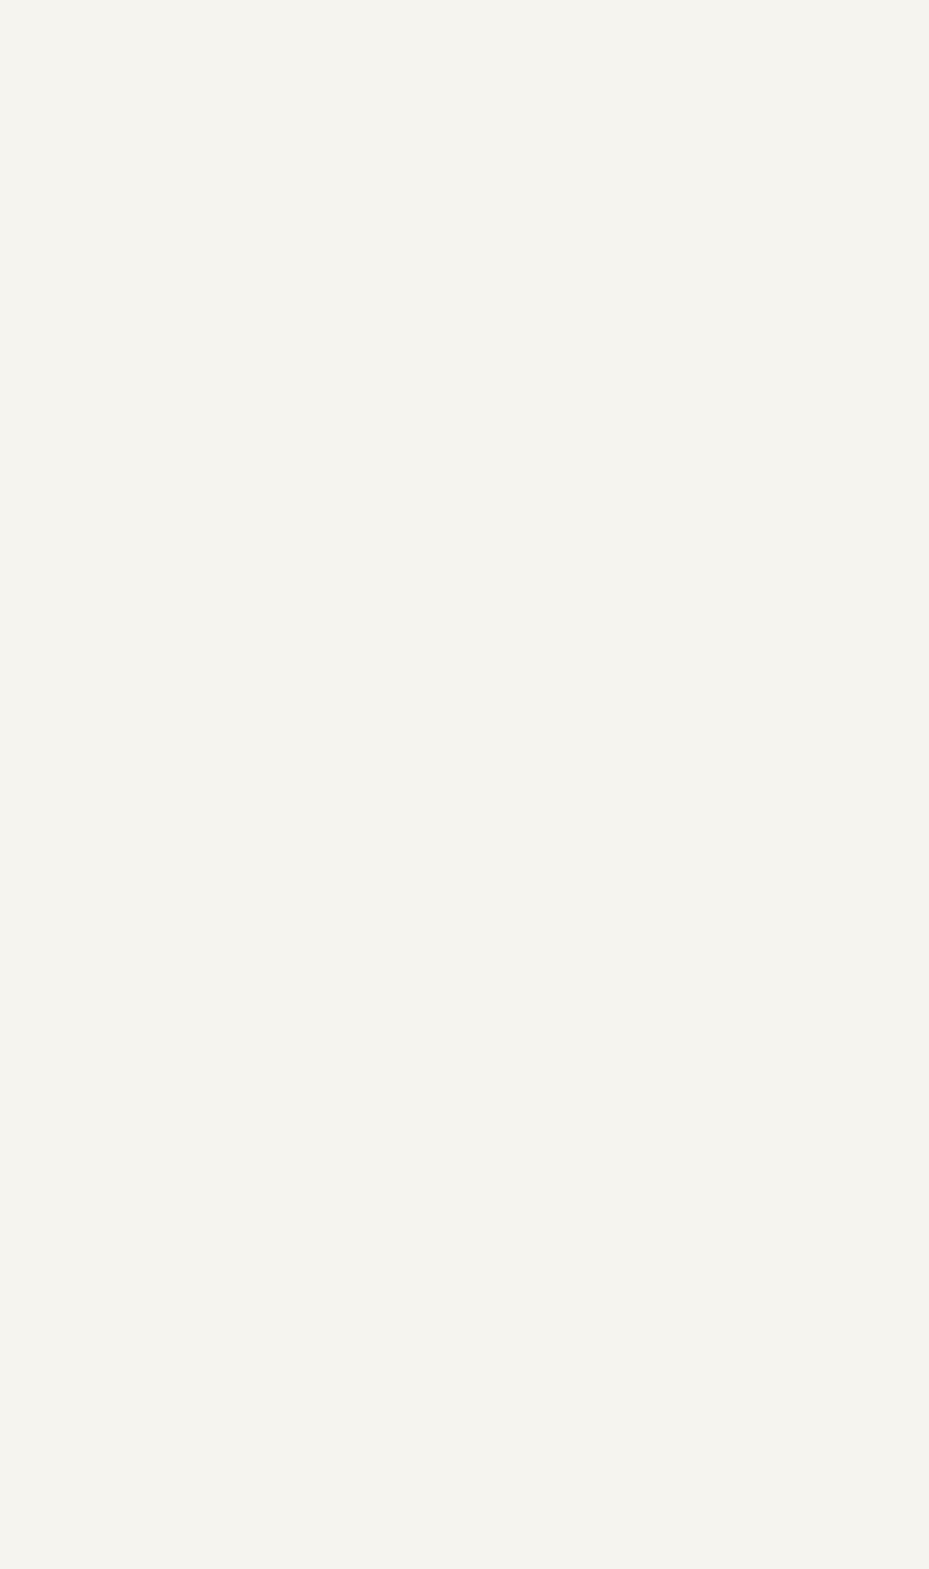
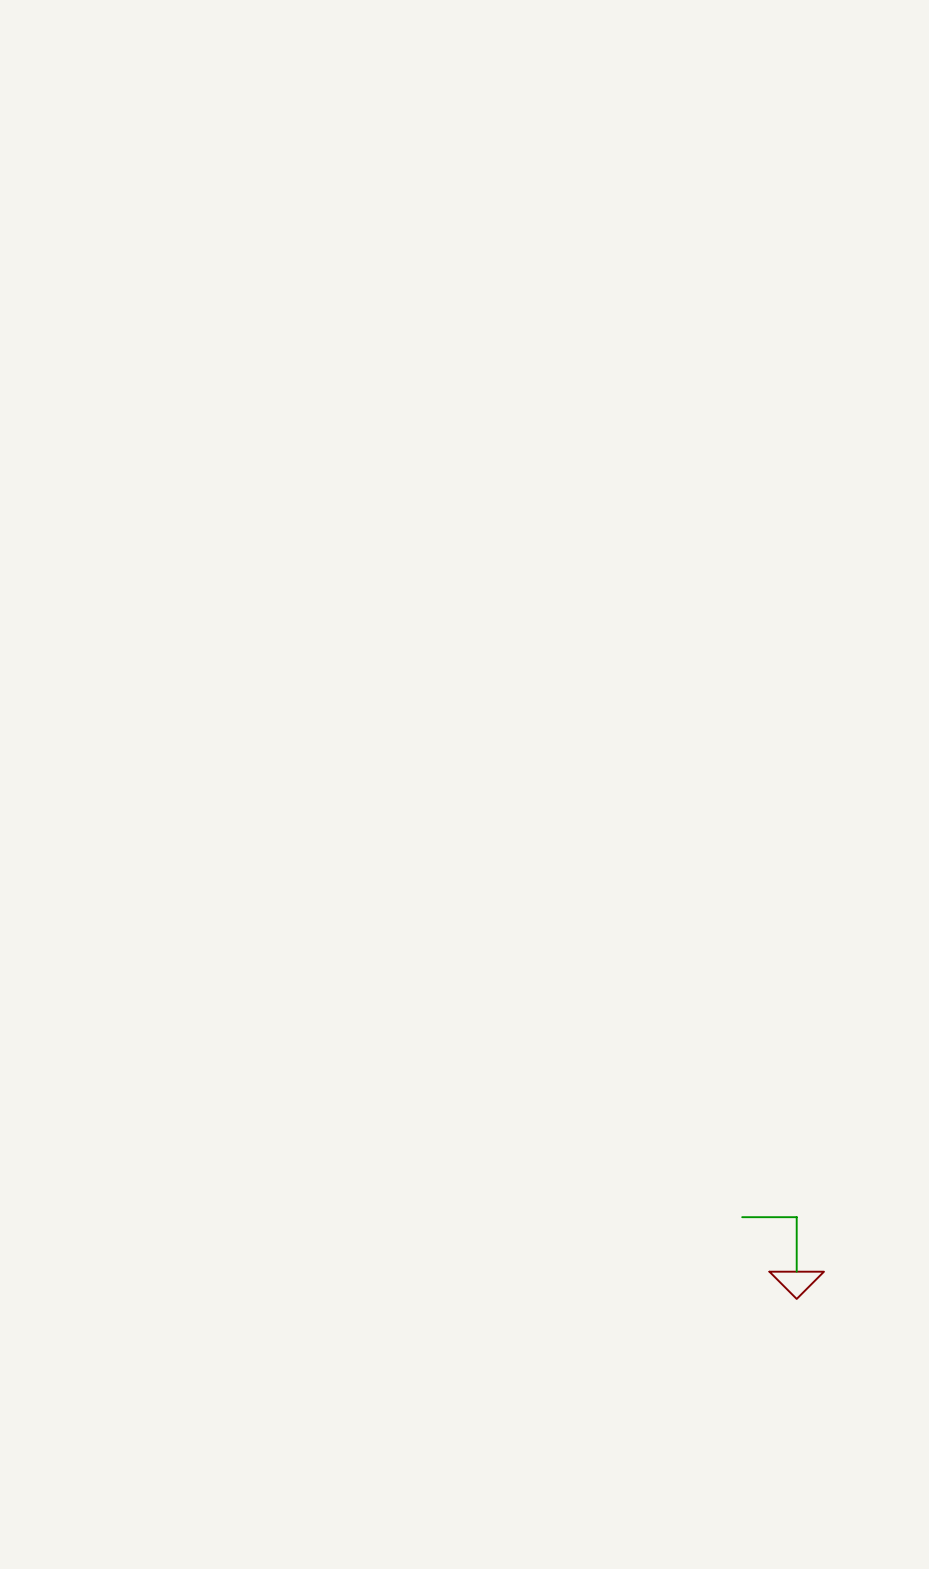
wire: none -> (742, 1217) (796, 1217) (796, 1271)
power symbol: none -> (796, 1285)

